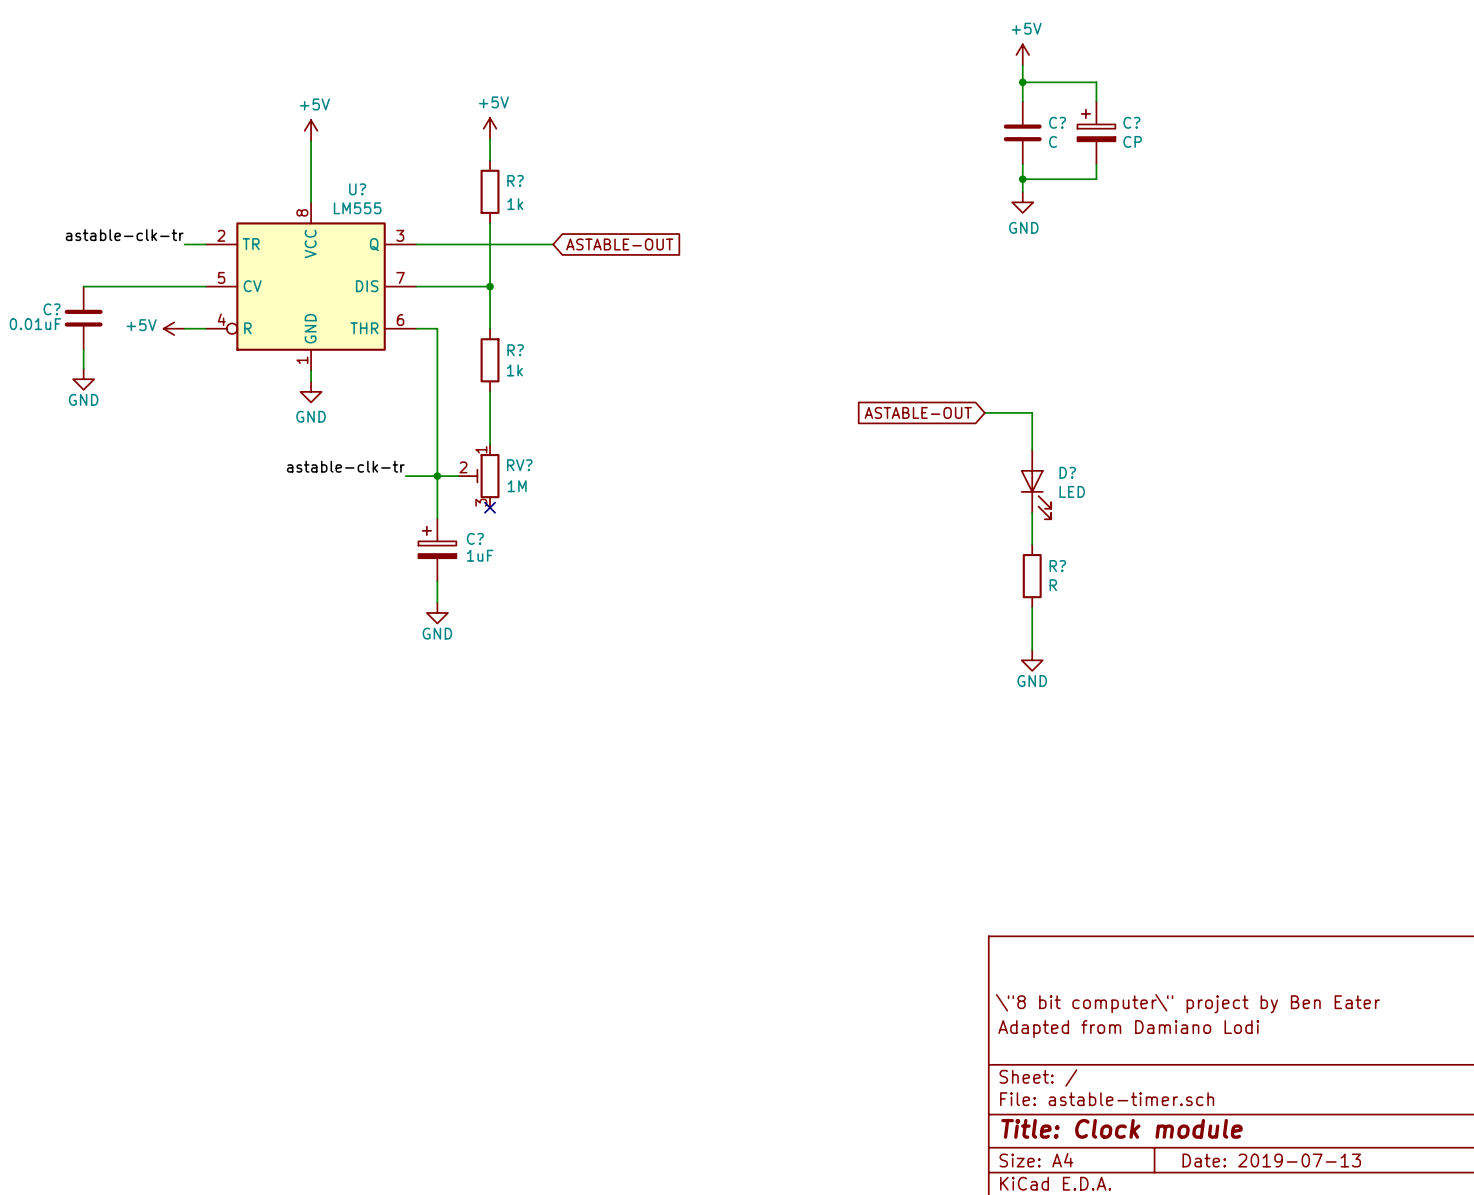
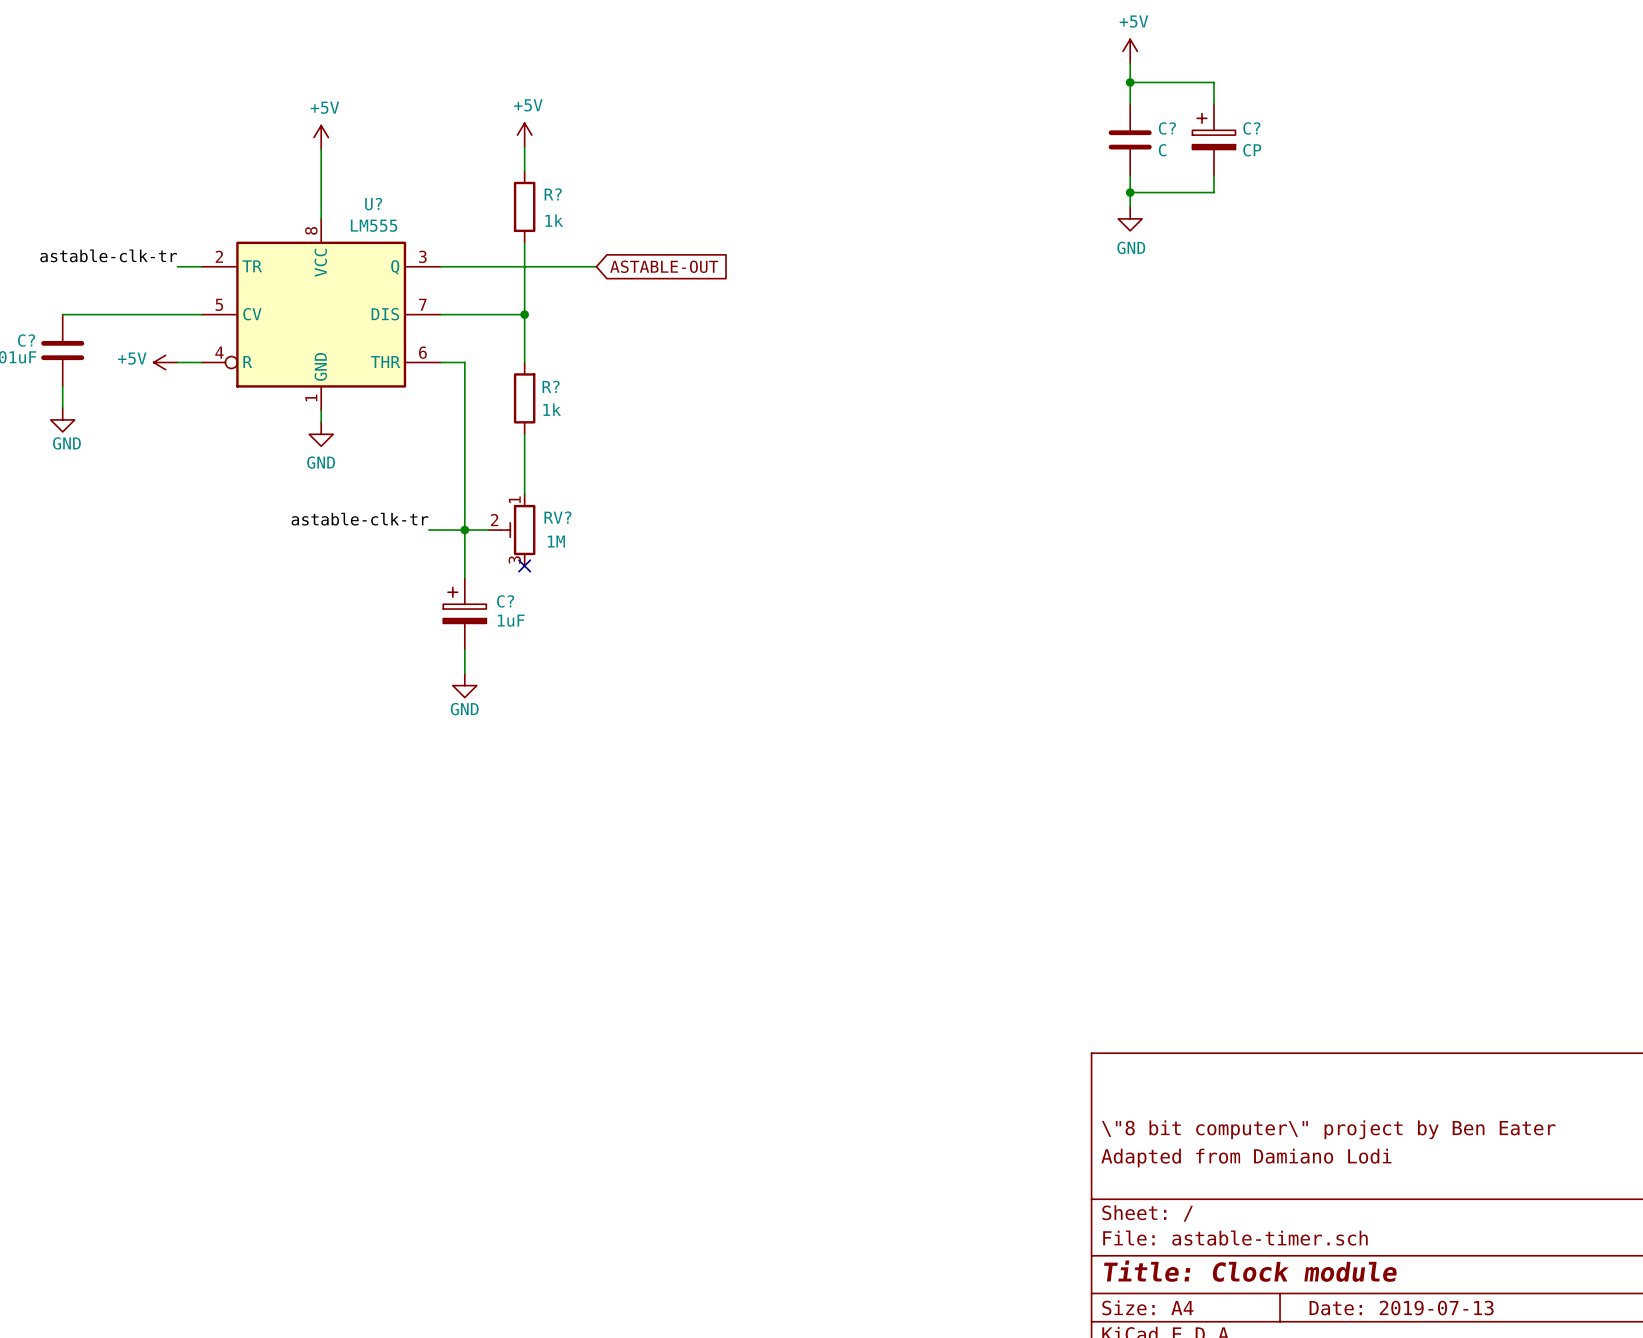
global label: ASTABLE-OUT (918, 412) -> none
wire: (984, 412) (1032, 412) (1032, 449) -> none
D?: LED (1036, 484) -> none
wire: (1032, 512) (1032, 544) -> none
R?: R (1032, 576) -> none
wire: (1032, 607) (1032, 649) -> none
power symbol: GND (1032, 660) -> none

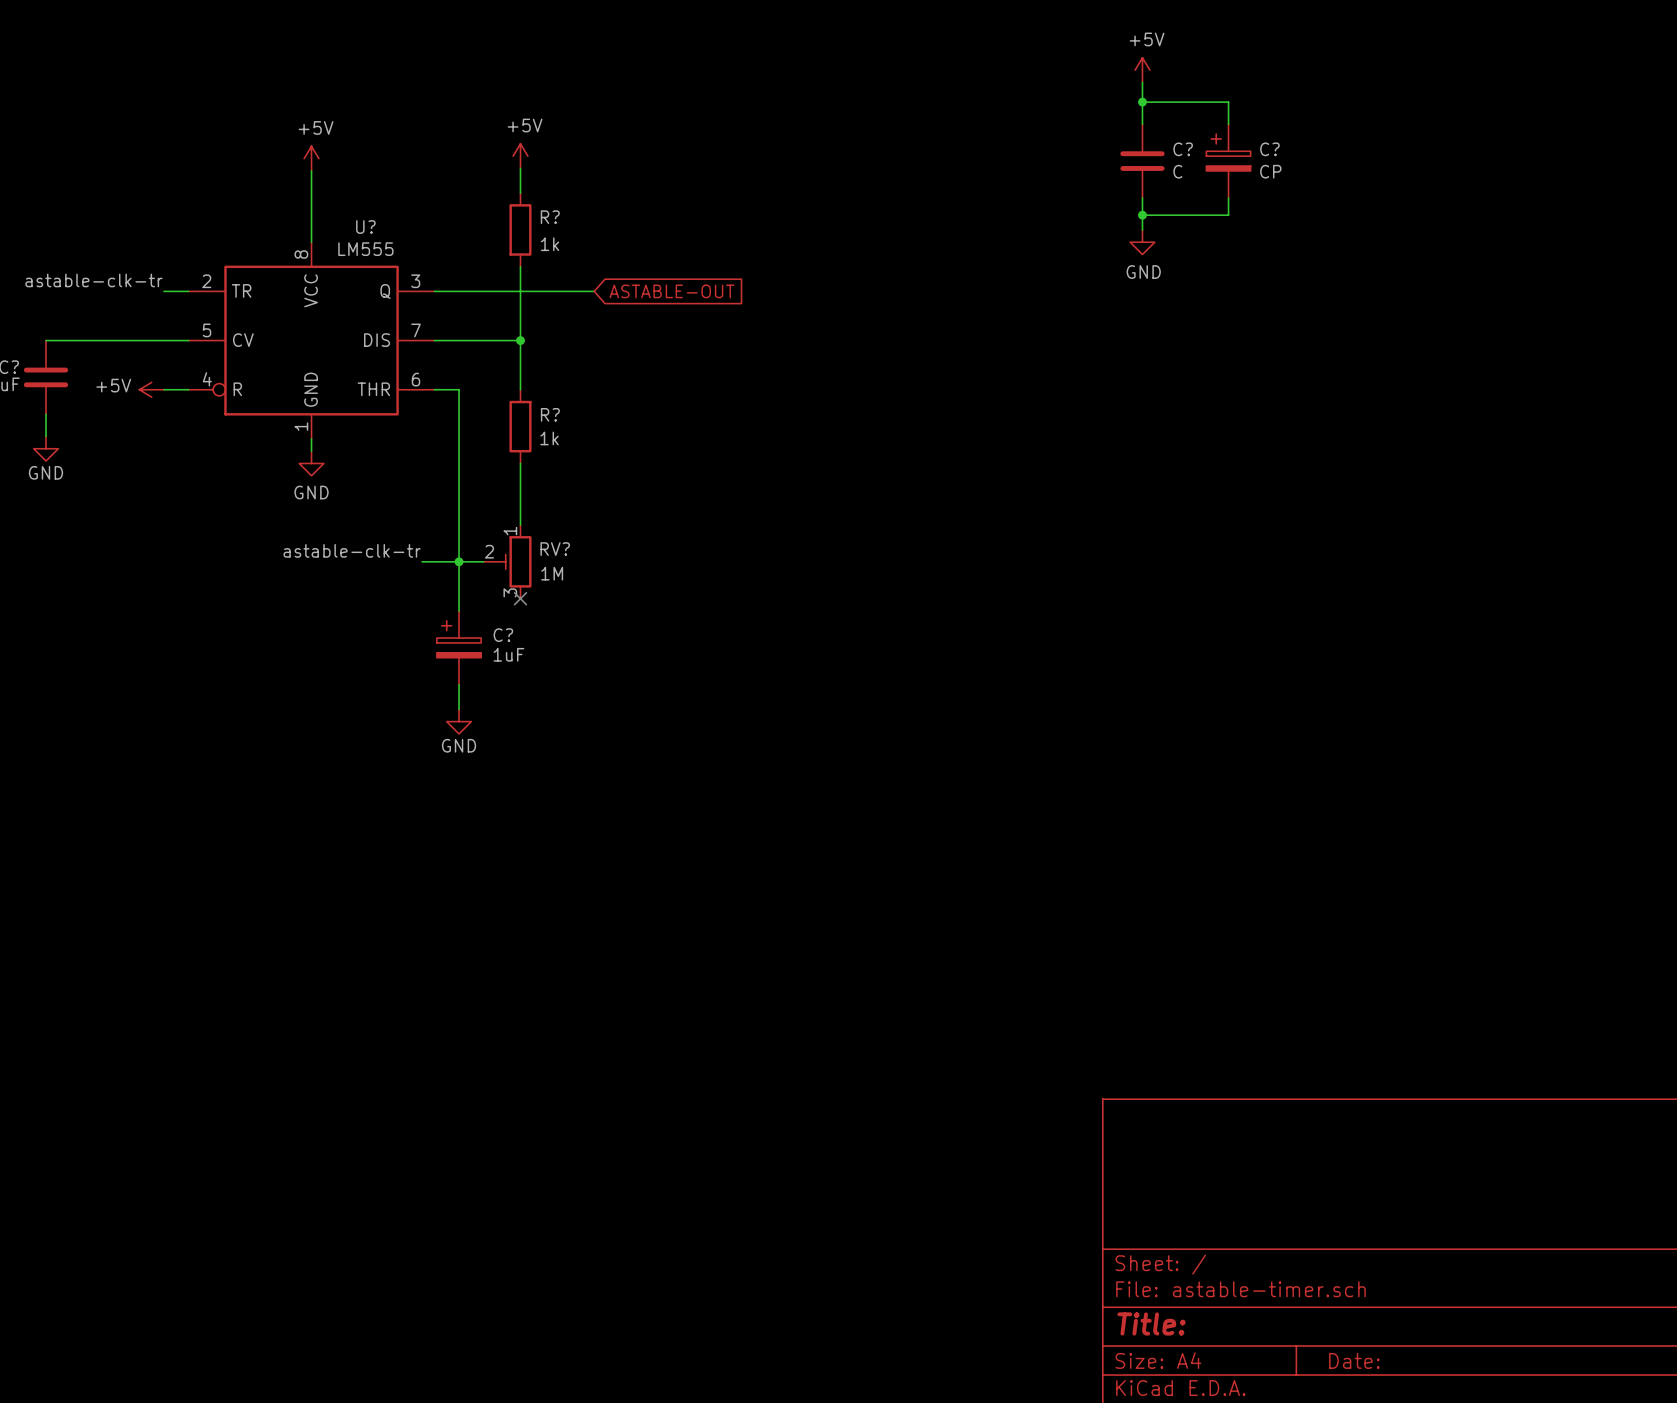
title block: \"8 bit computer\" project by Ben Eater (1328, 1129) -> none
title block: Adapted from Damiano Lodi (1246, 1158) -> none
title block: Title: Clock module (1250, 1271) -> Title: (1151, 1323)
title block: Date: 2019-07-13 (1401, 1308) -> Date: (1354, 1360)

